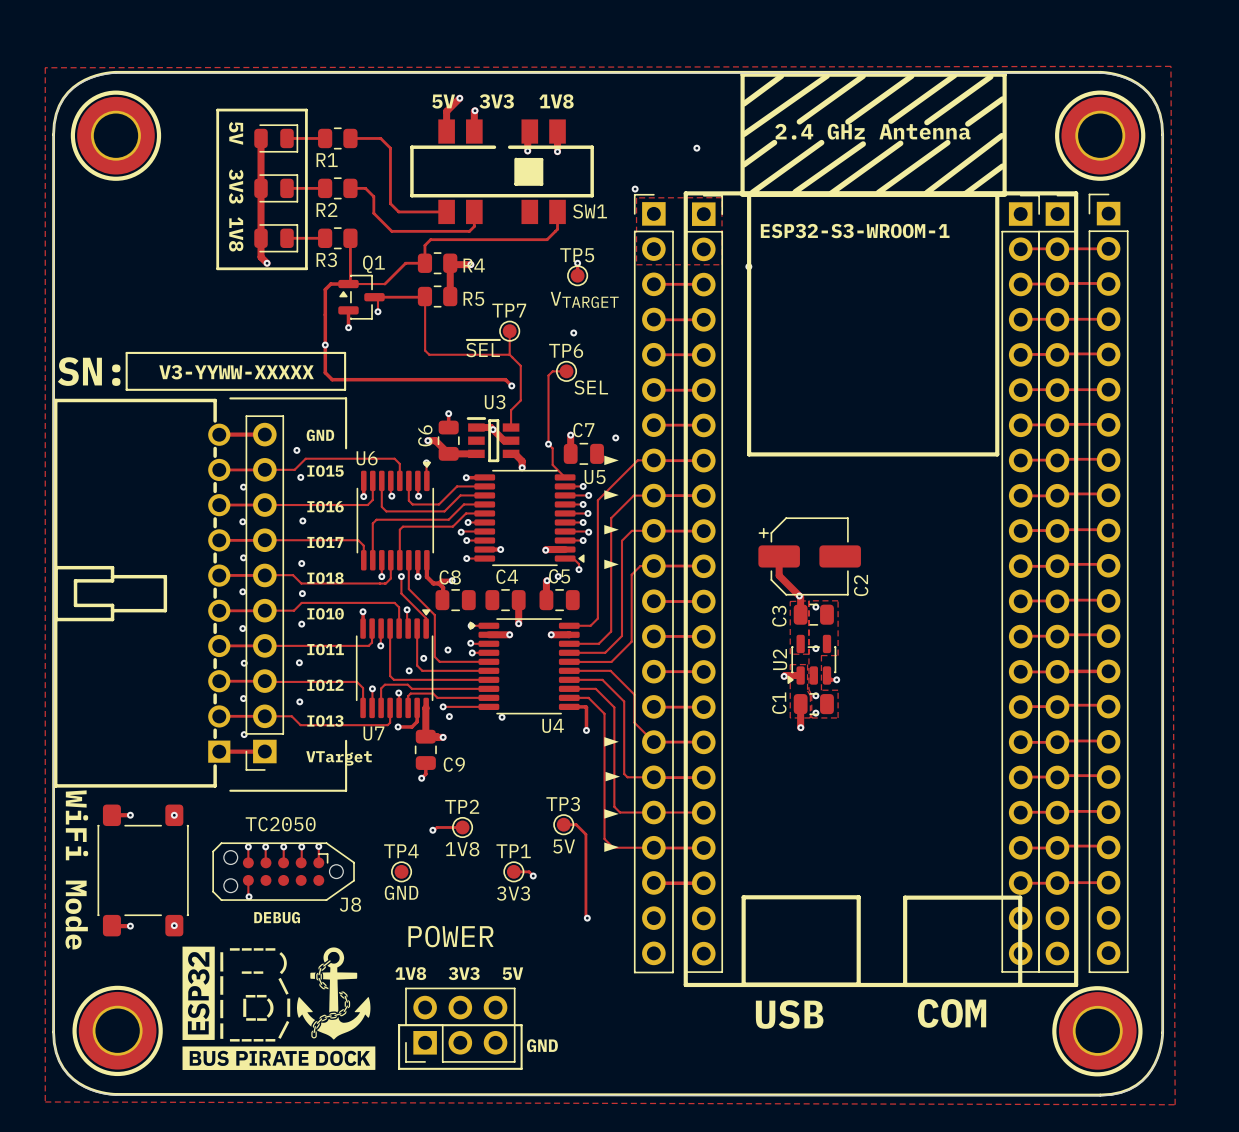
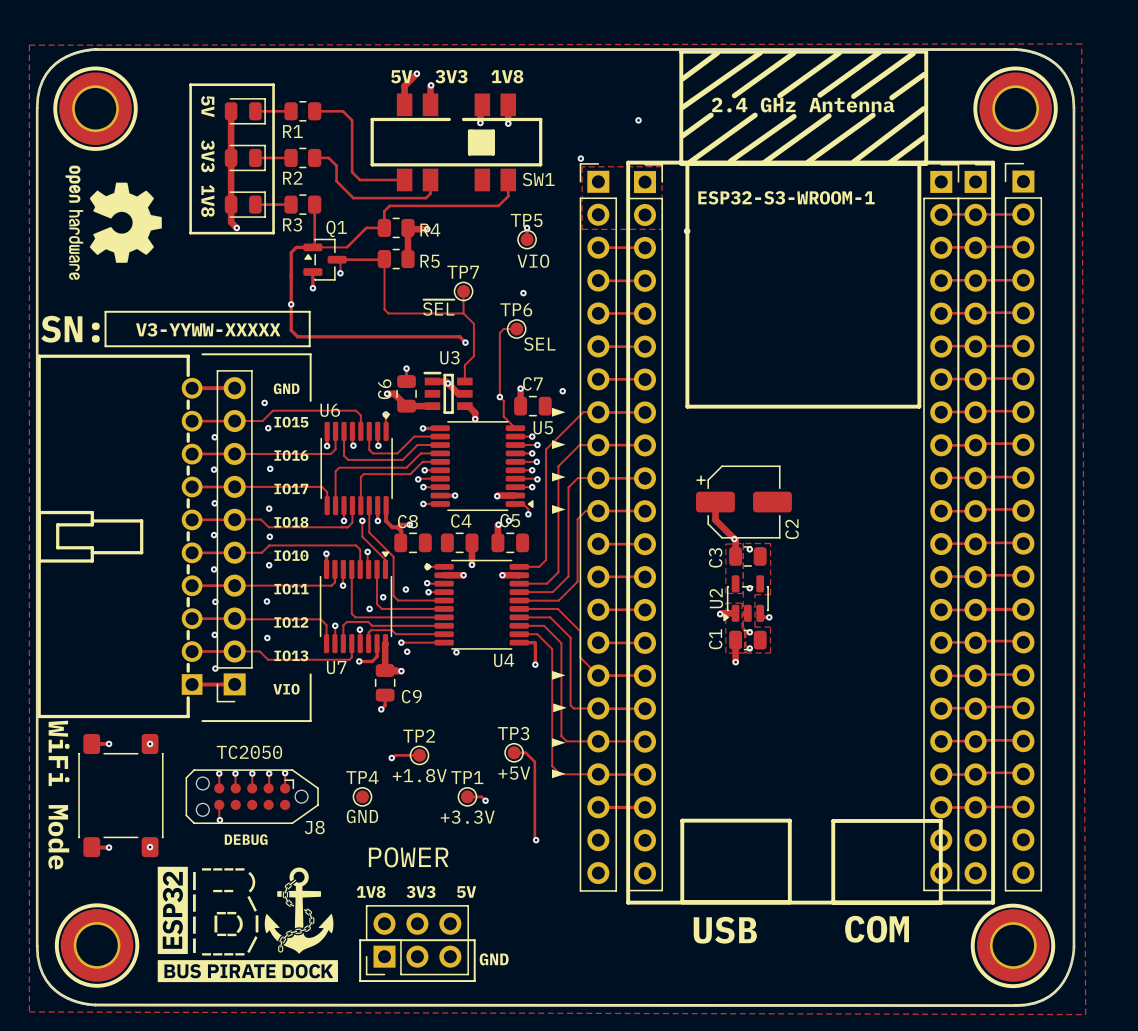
drawing: none -> [65, 165, 162, 280]
TP5 value: VTARGET (584, 299) -> VIO (533, 261)
text: VTarget (339, 758) -> VIO (286, 689)
TP3 value: 5V (564, 846) -> +5V (514, 773)
TP2 value: 1V8 (462, 849) -> +1.8V (419, 775)
TP1 value: 3V3 (513, 893) -> +3.3V (467, 817)

